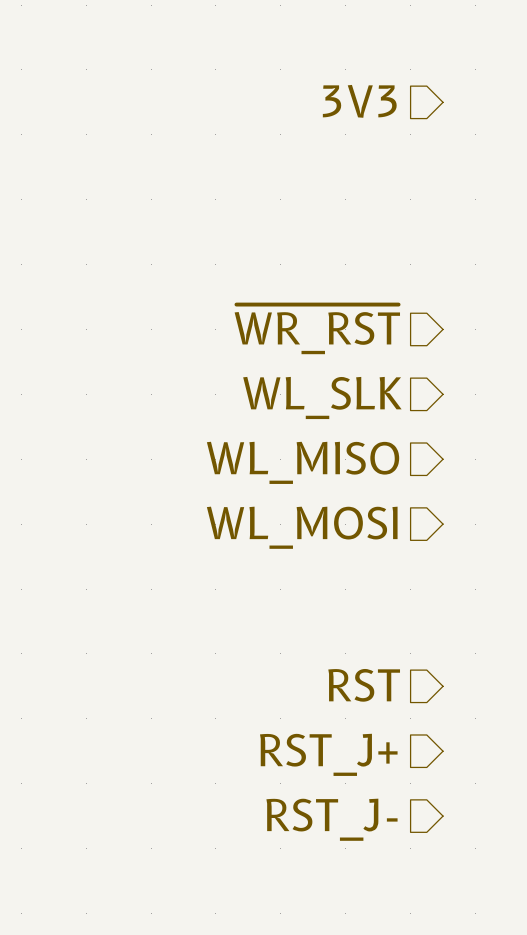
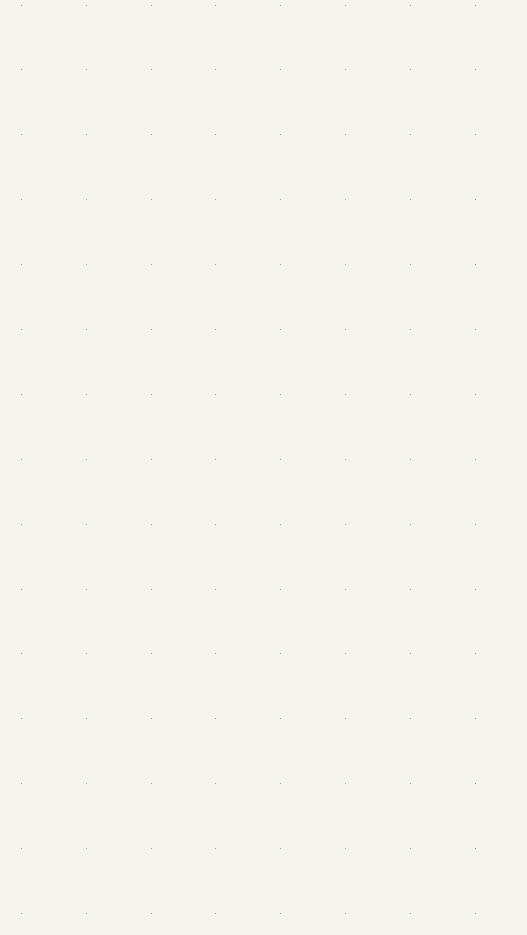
hierarchical label: 3V3 (359, 101) -> none
hierarchical label: ~{WR_RST} (317, 329) -> none
hierarchical label: WL_SLK (322, 397) -> none
hierarchical label: WL_MISO (303, 462) -> none
hierarchical label: WL_MOSI (302, 527) -> none
hierarchical label: RST (364, 685) -> none
hierarchical label: RST_J+ (328, 754) -> none
hierarchical label: RST_J- (331, 819) -> none

